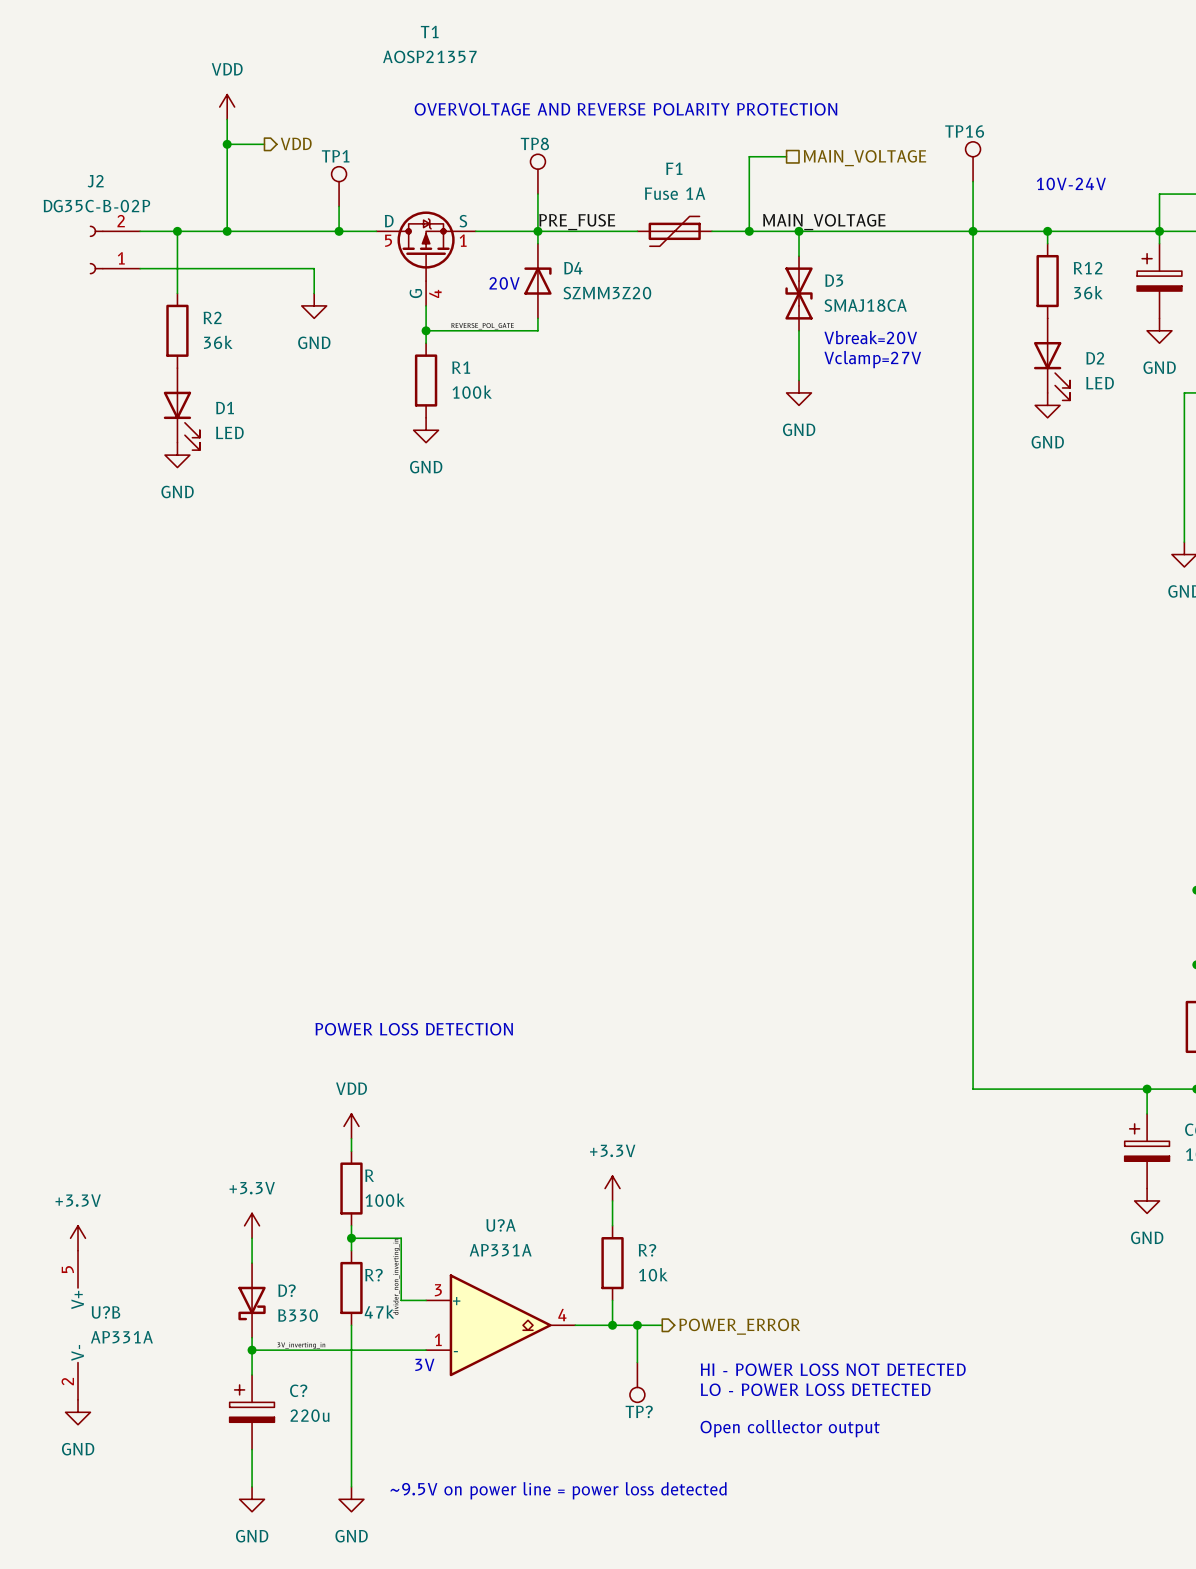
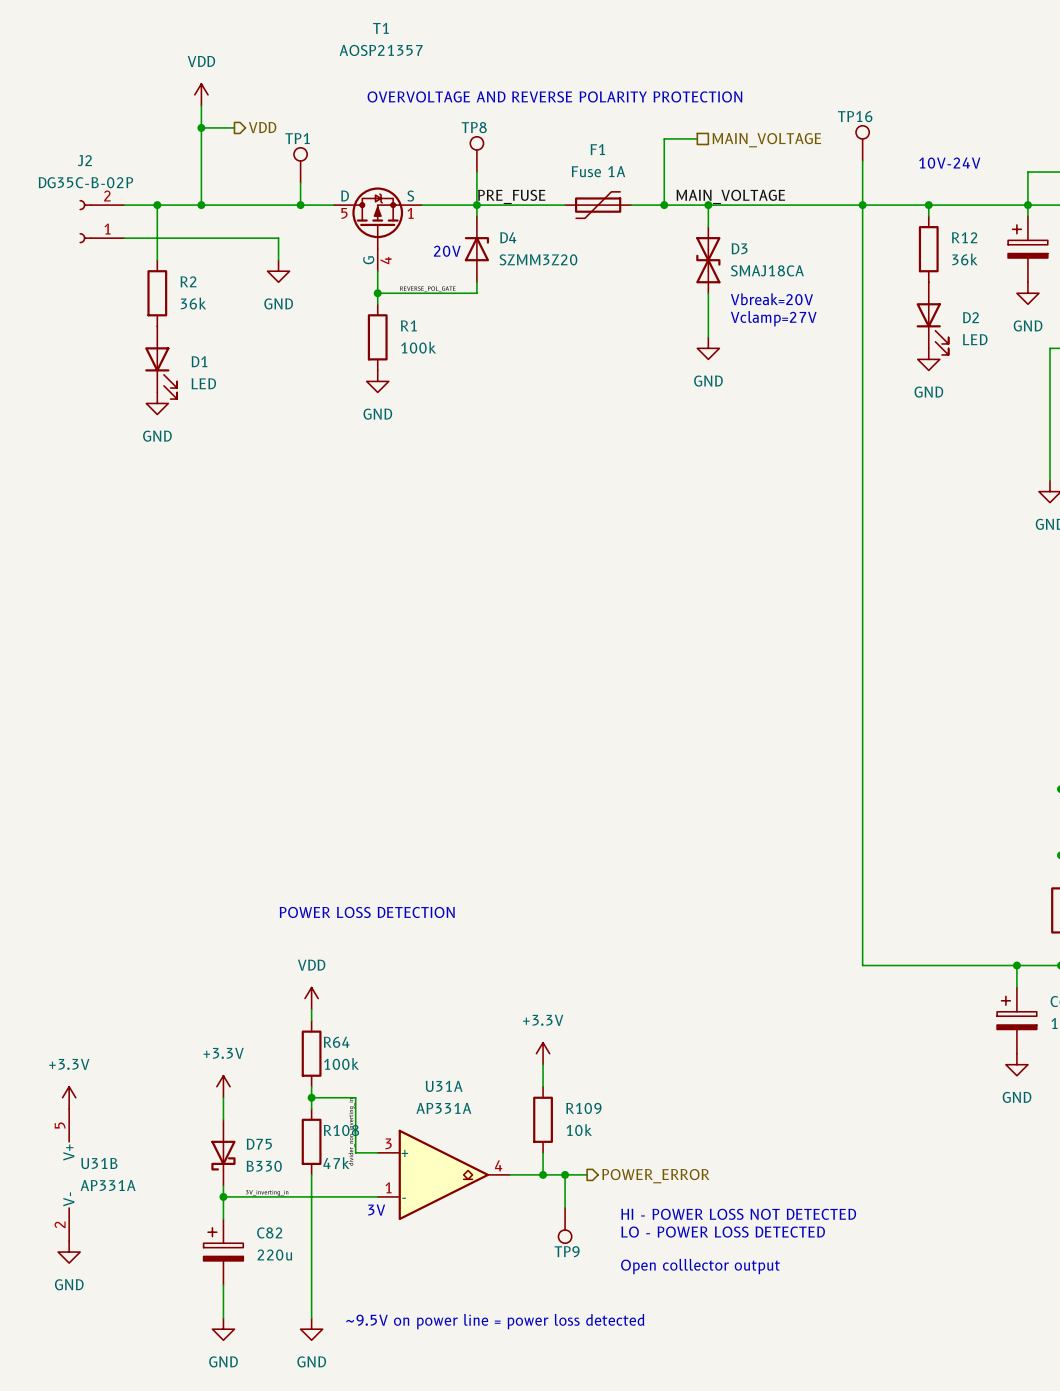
R name: R (369, 1175) -> R64 (336, 1042)
U?A name: U?A (501, 1225) -> U31A (444, 1086)
R? name: R? (647, 1250) -> R109 (583, 1108)
R? name: R? (373, 1275) -> R108 (341, 1130)
D? name: D? (287, 1290) -> D75 (259, 1144)
U?B name: U?B (105, 1312) -> U31B (99, 1163)
C? name: C? (298, 1390) -> C82 (269, 1232)
TP? name: TP? (639, 1411) -> TP9 (567, 1251)

